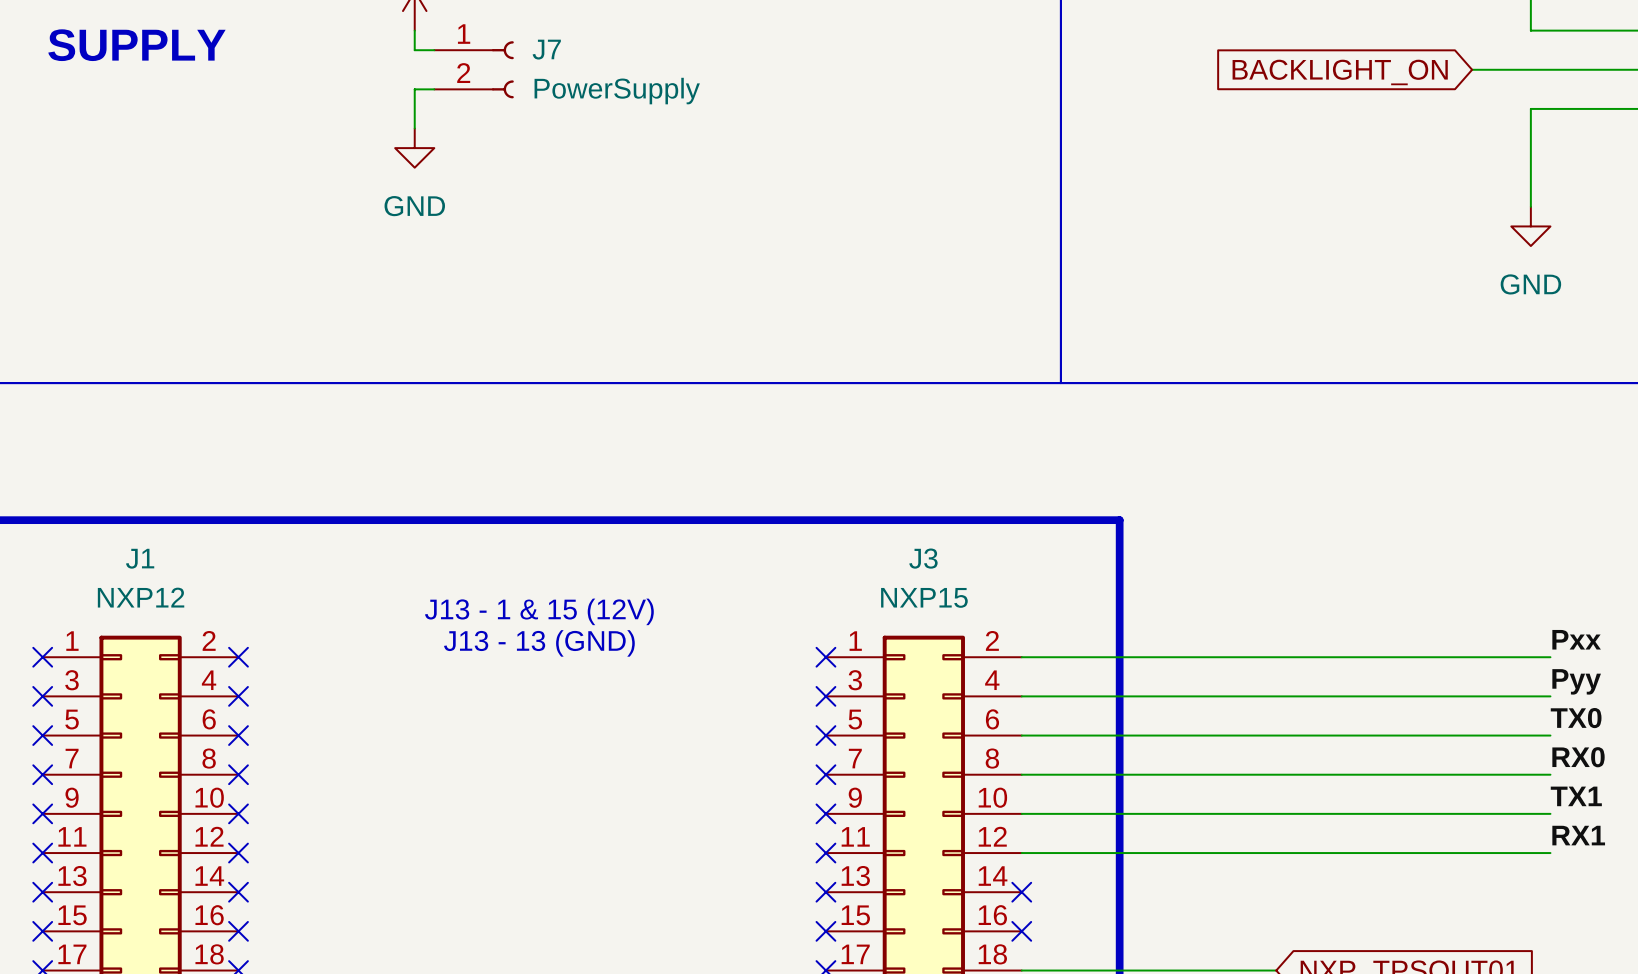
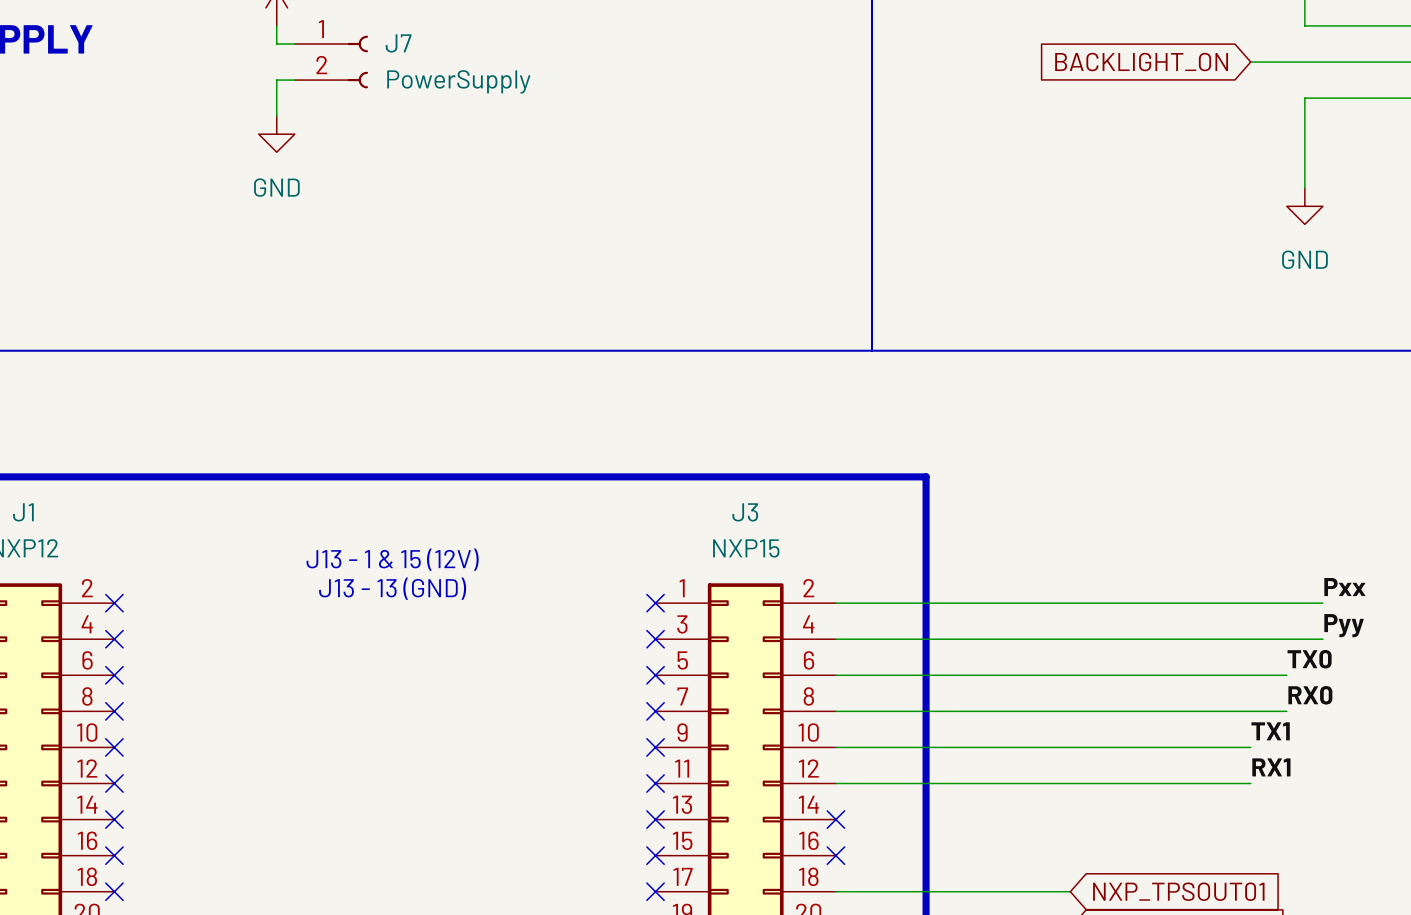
label position: TX0 (1576, 718) -> TX0 (1309, 659)
wire: (1511, 735) (1550, 735) -> none
label position: RX0 (1578, 757) -> RX0 (1310, 695)
wire: (1511, 774) (1550, 774) -> none
label position: TX1 (1576, 796) -> TX1 (1270, 731)
wire: (1472, 813) (1550, 813) -> none
label position: RX1 (1578, 835) -> RX1 (1271, 767)
wire: (1472, 853) (1550, 853) -> none

